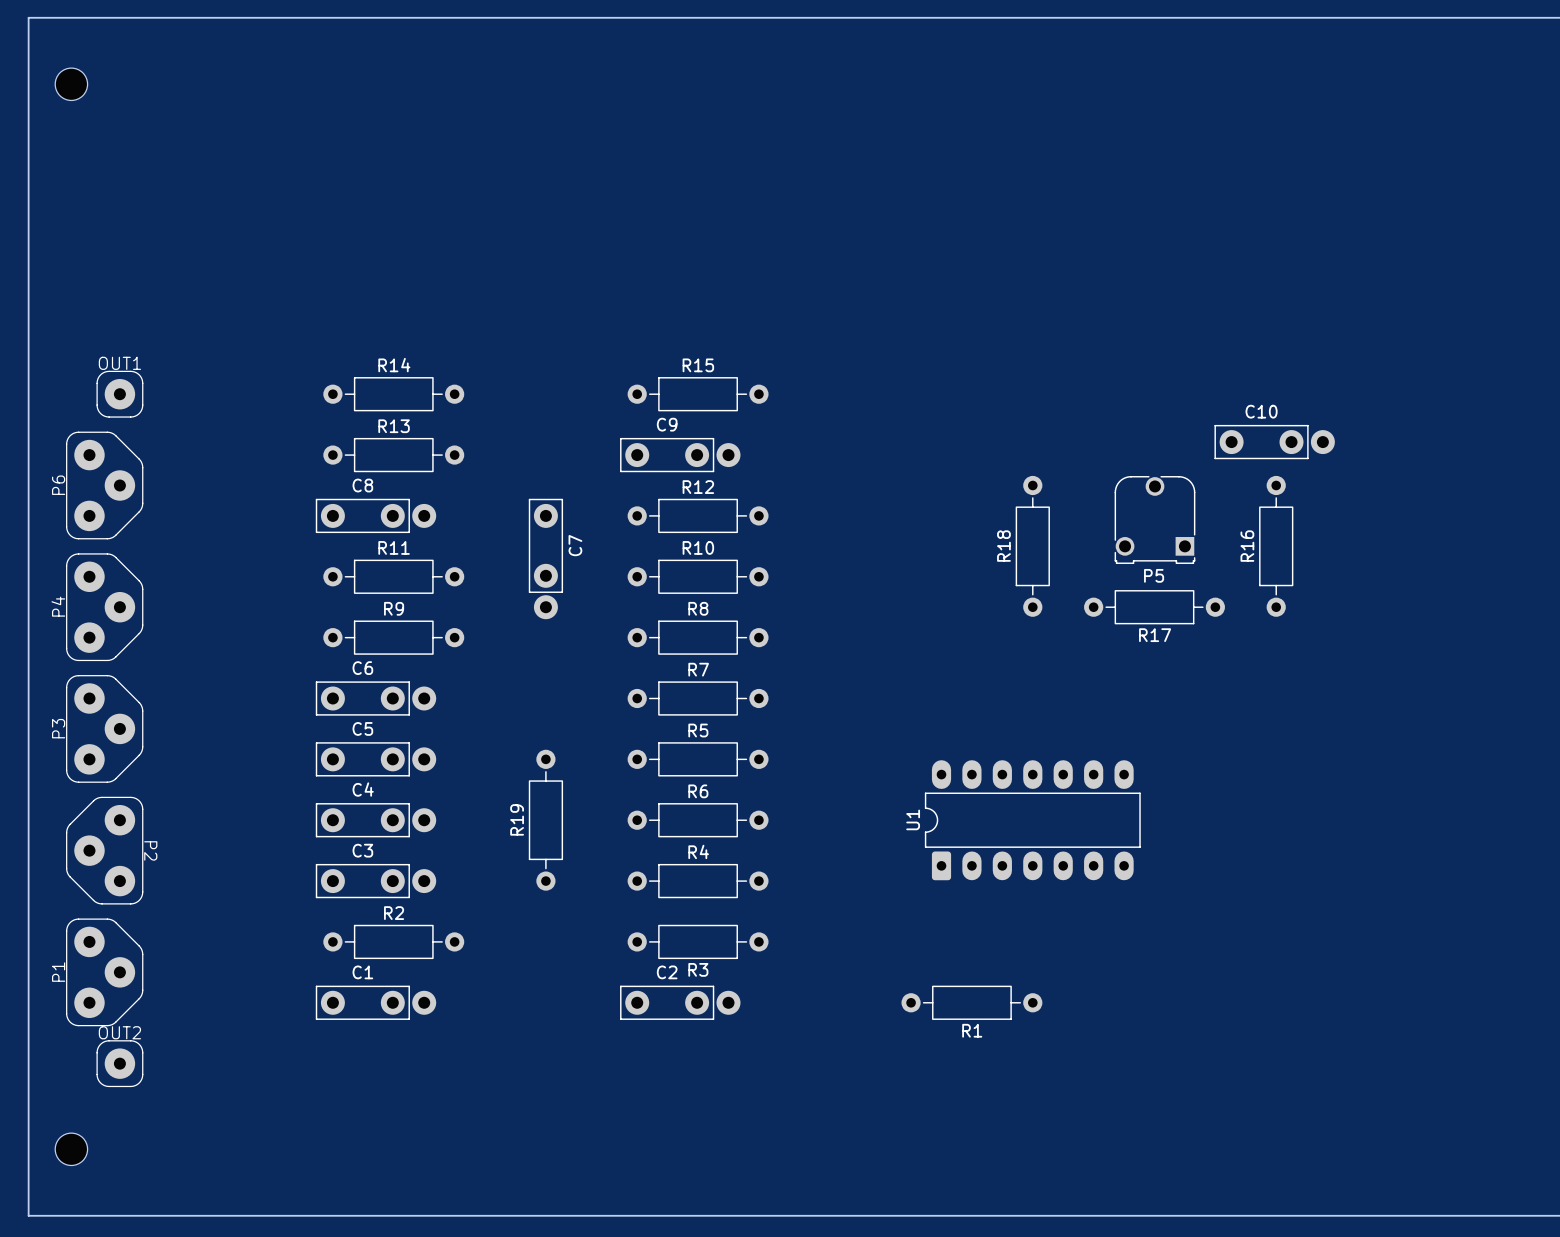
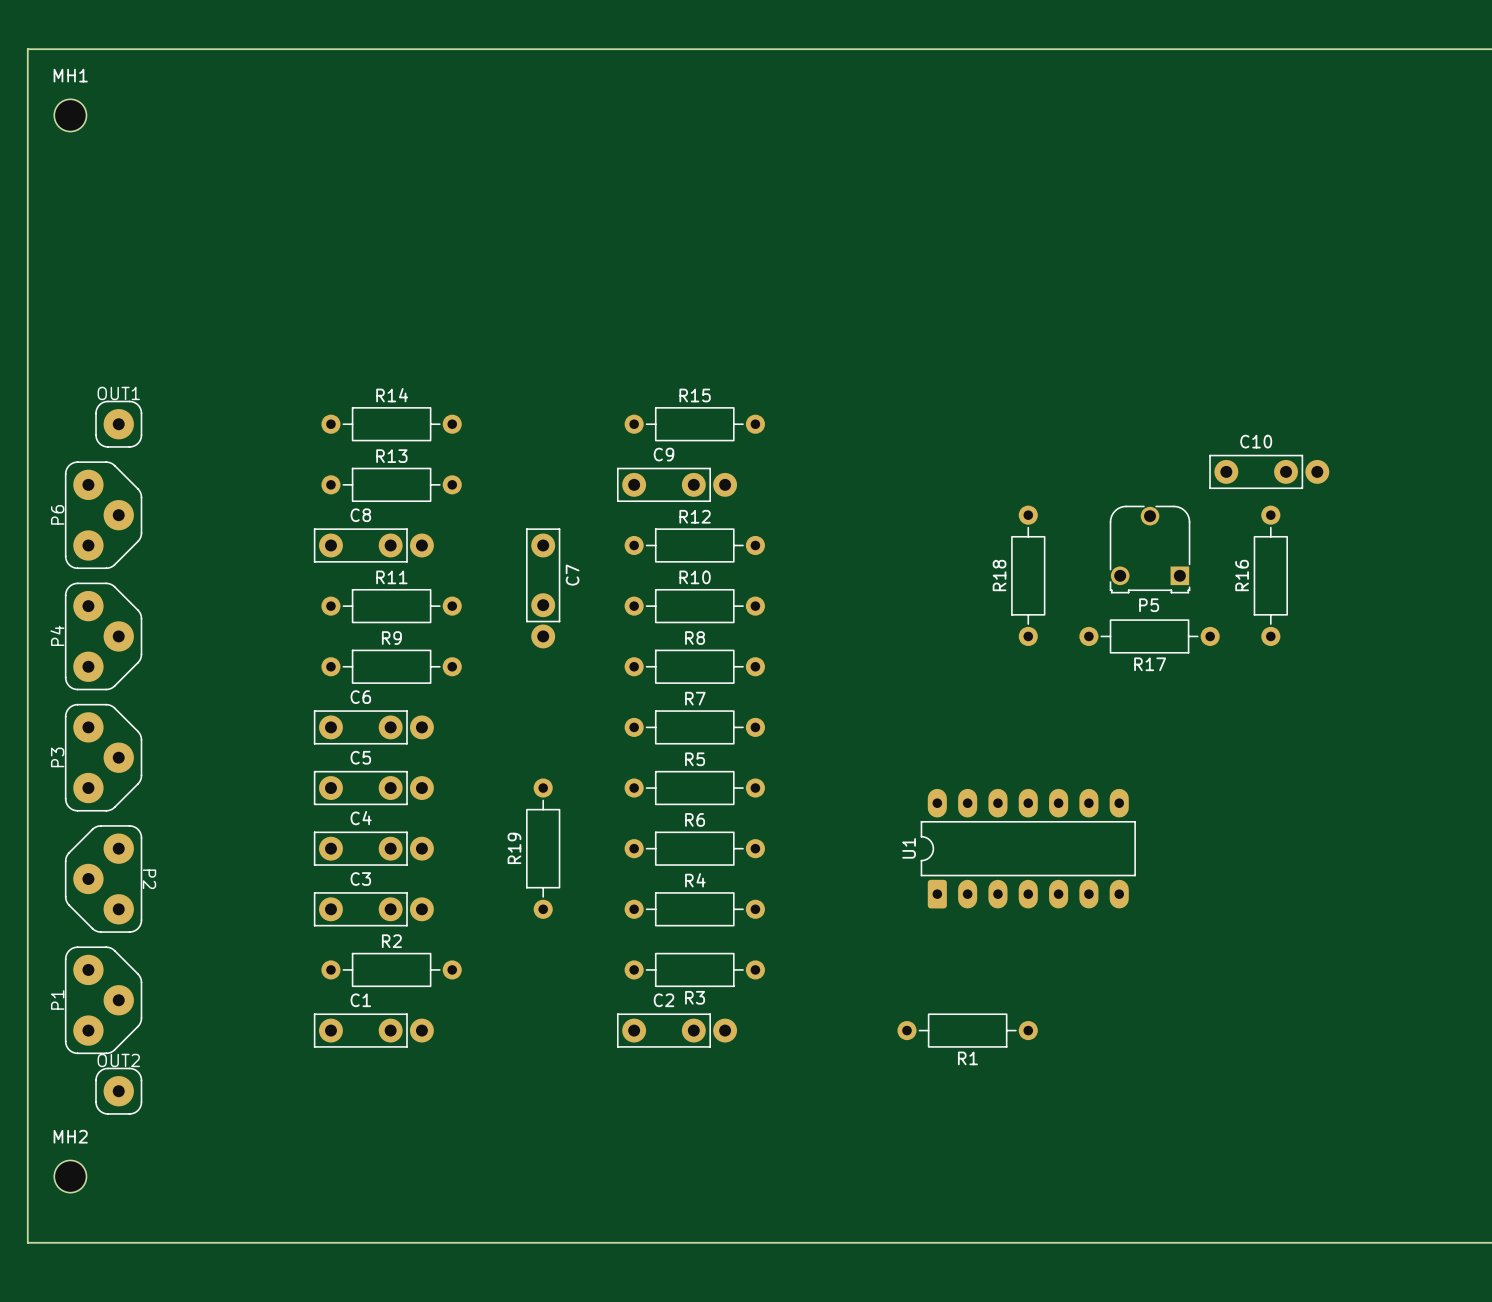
MH1 name: none -> MH1 (70, 75)
MH2 name: none -> MH2 (70, 1136)

